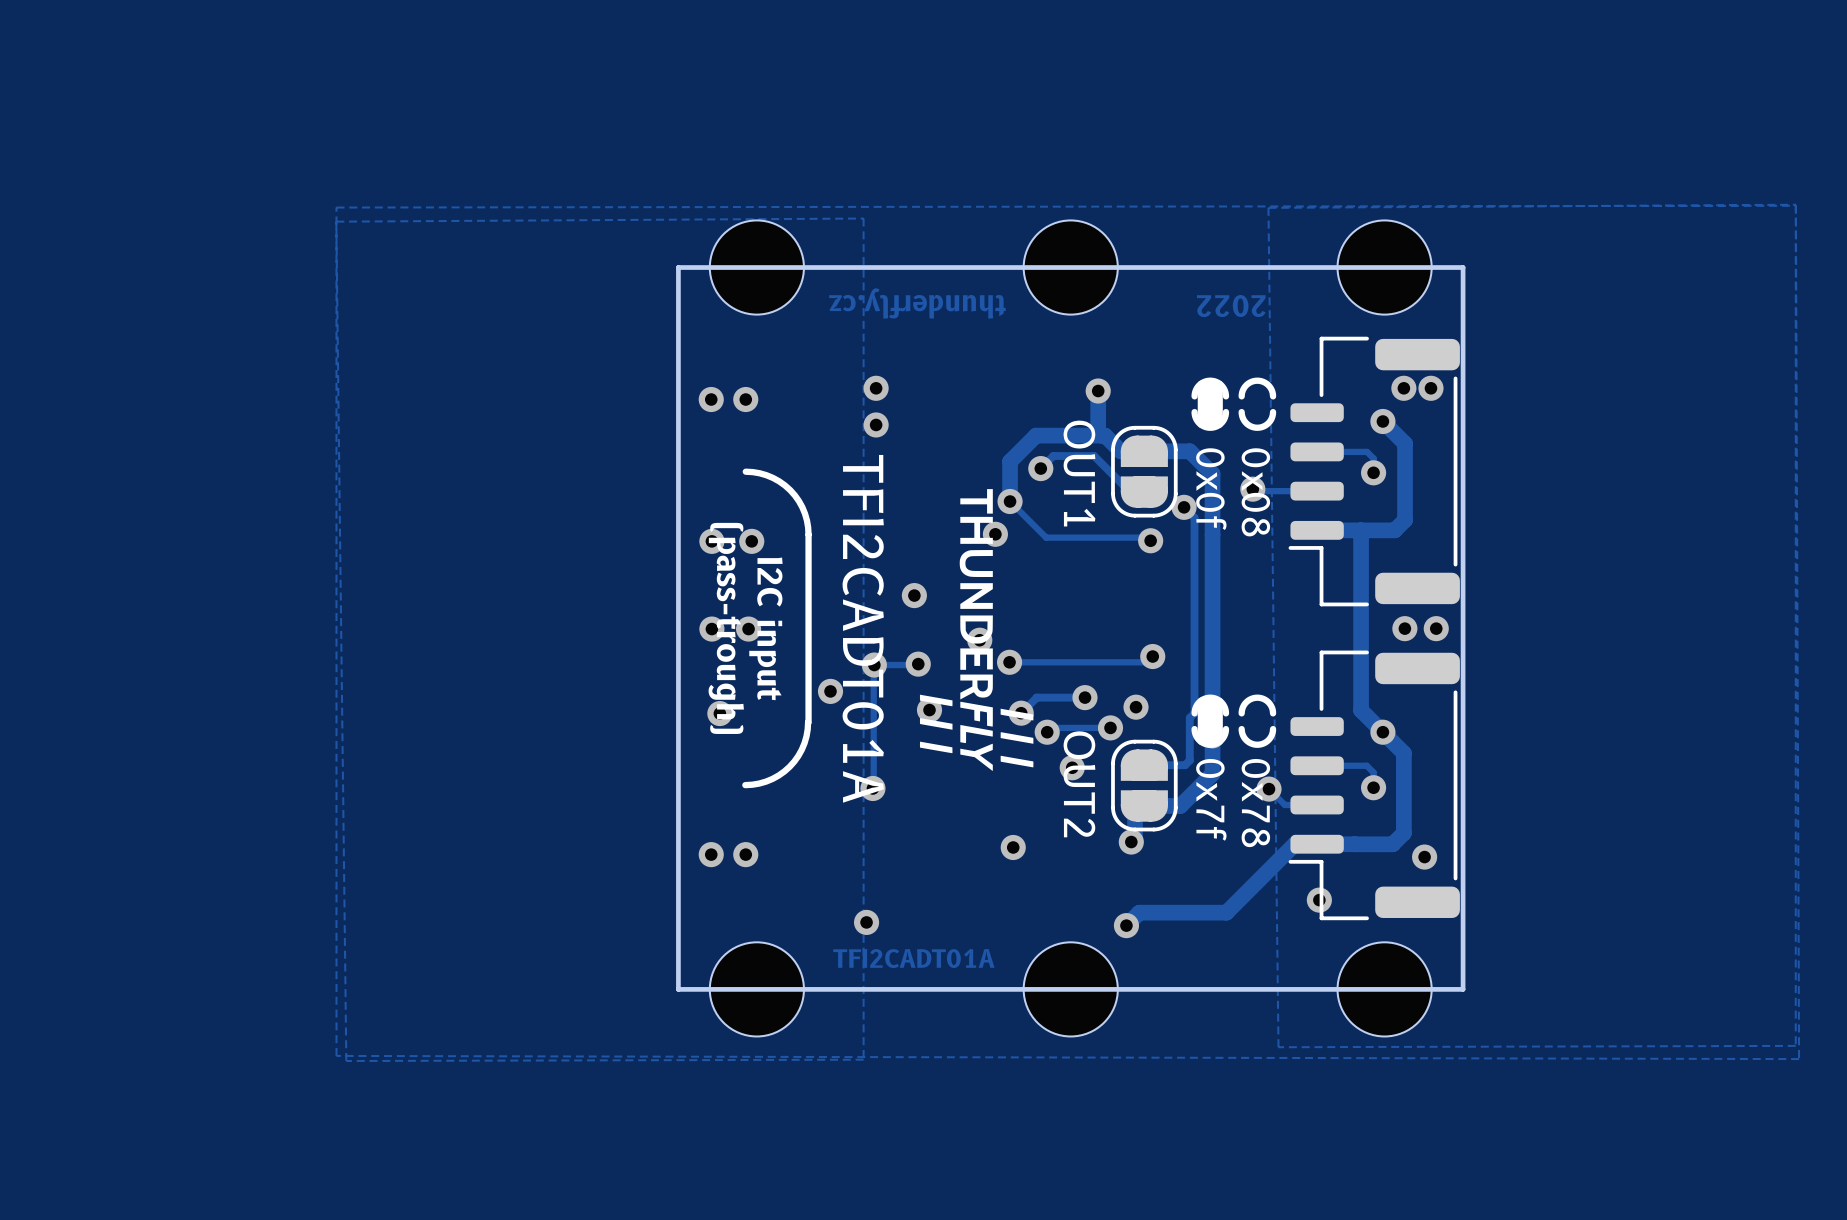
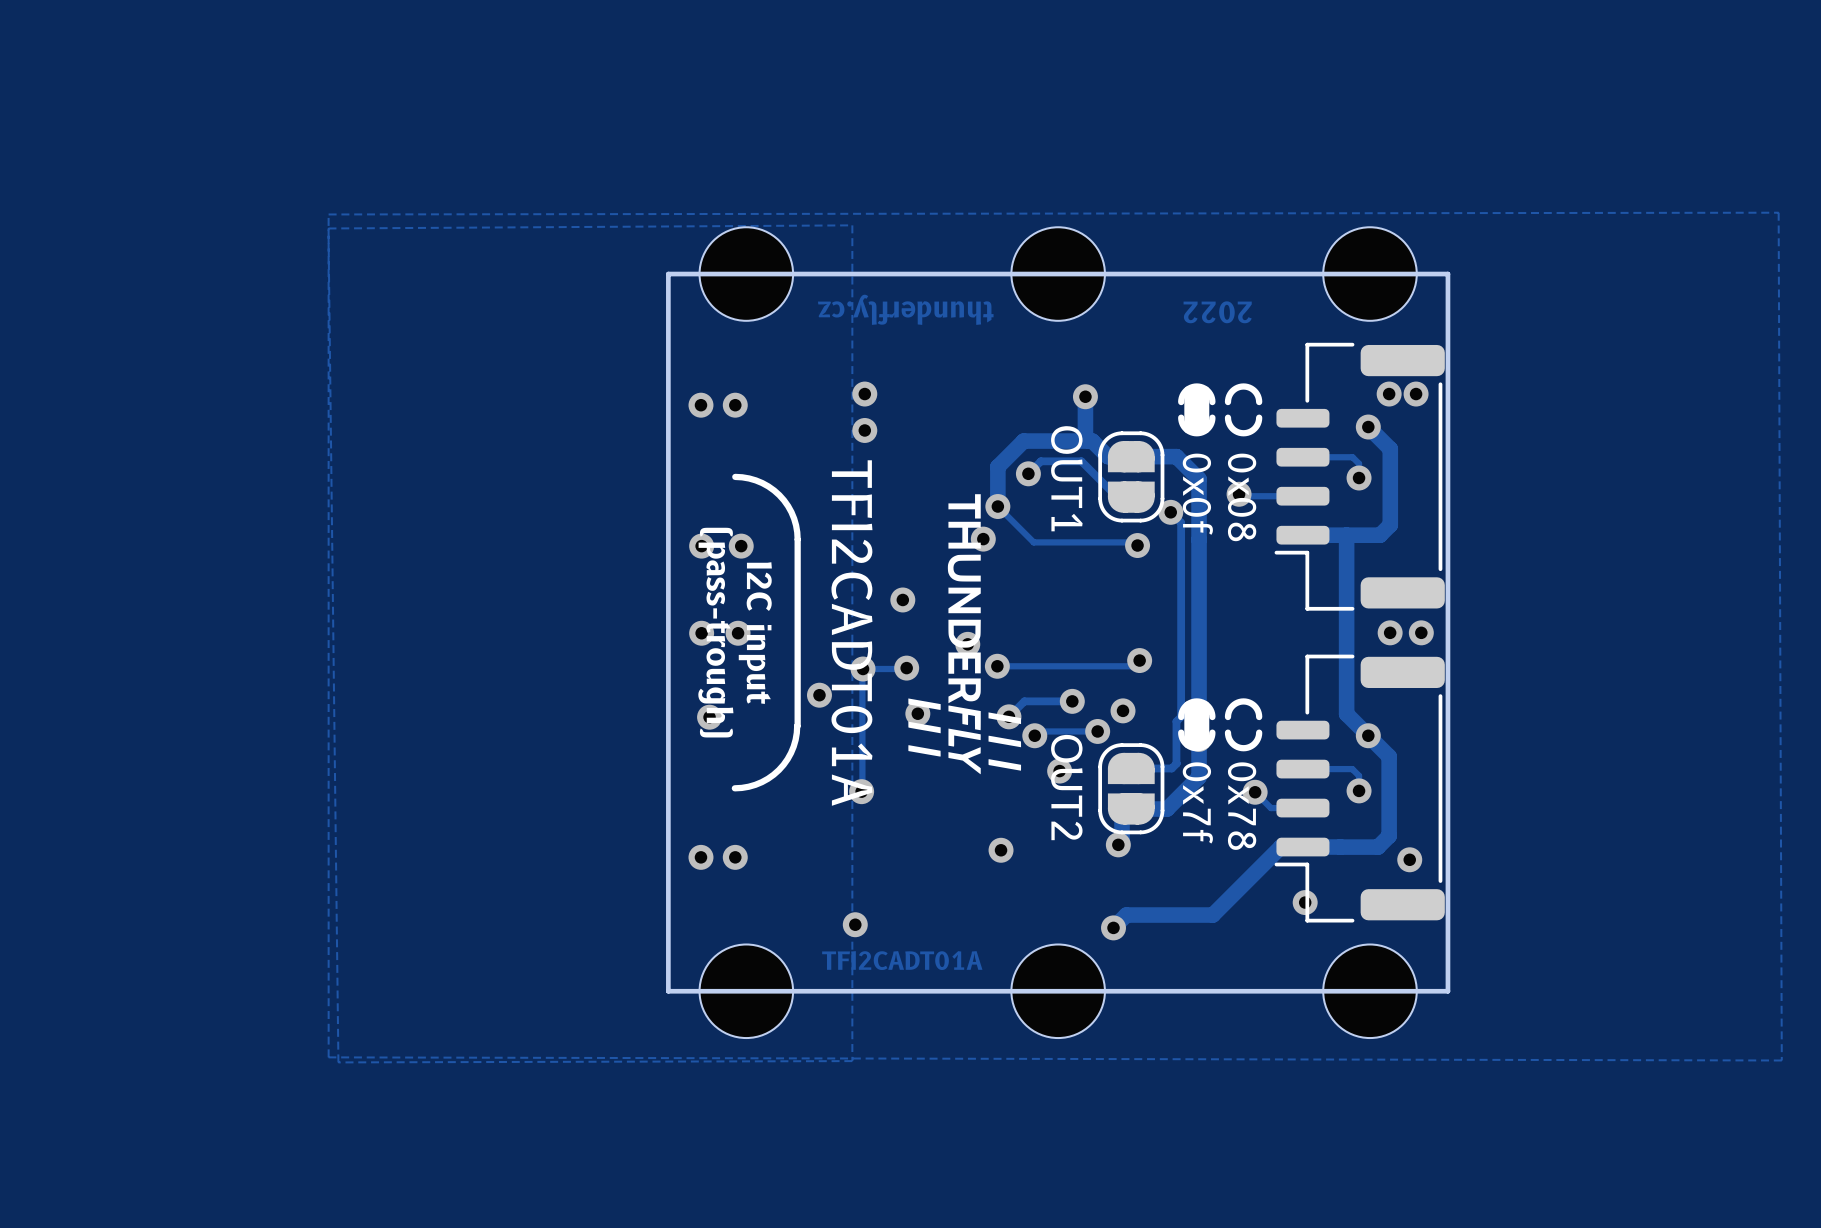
zone outline: (1795, 204) (1795, 1045) (1278, 1047) (1268, 207) (1795, 204) -> none

